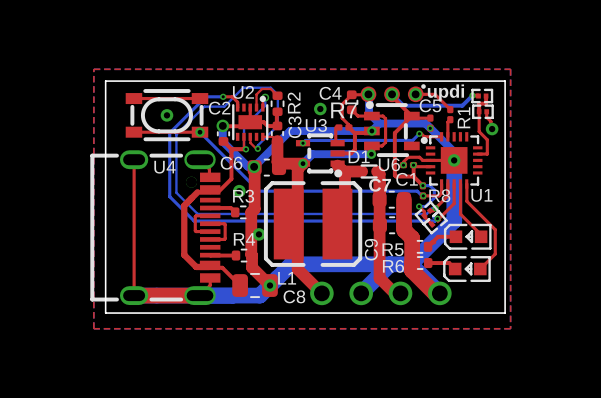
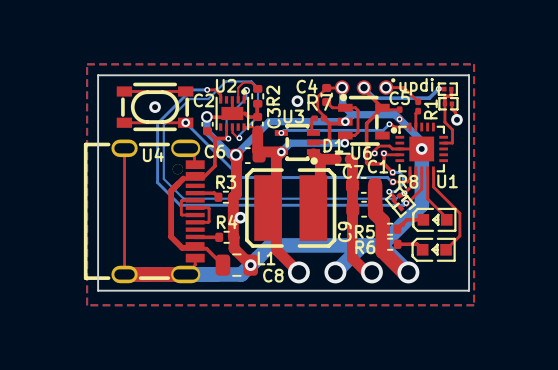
via: (239, 191) -> none

